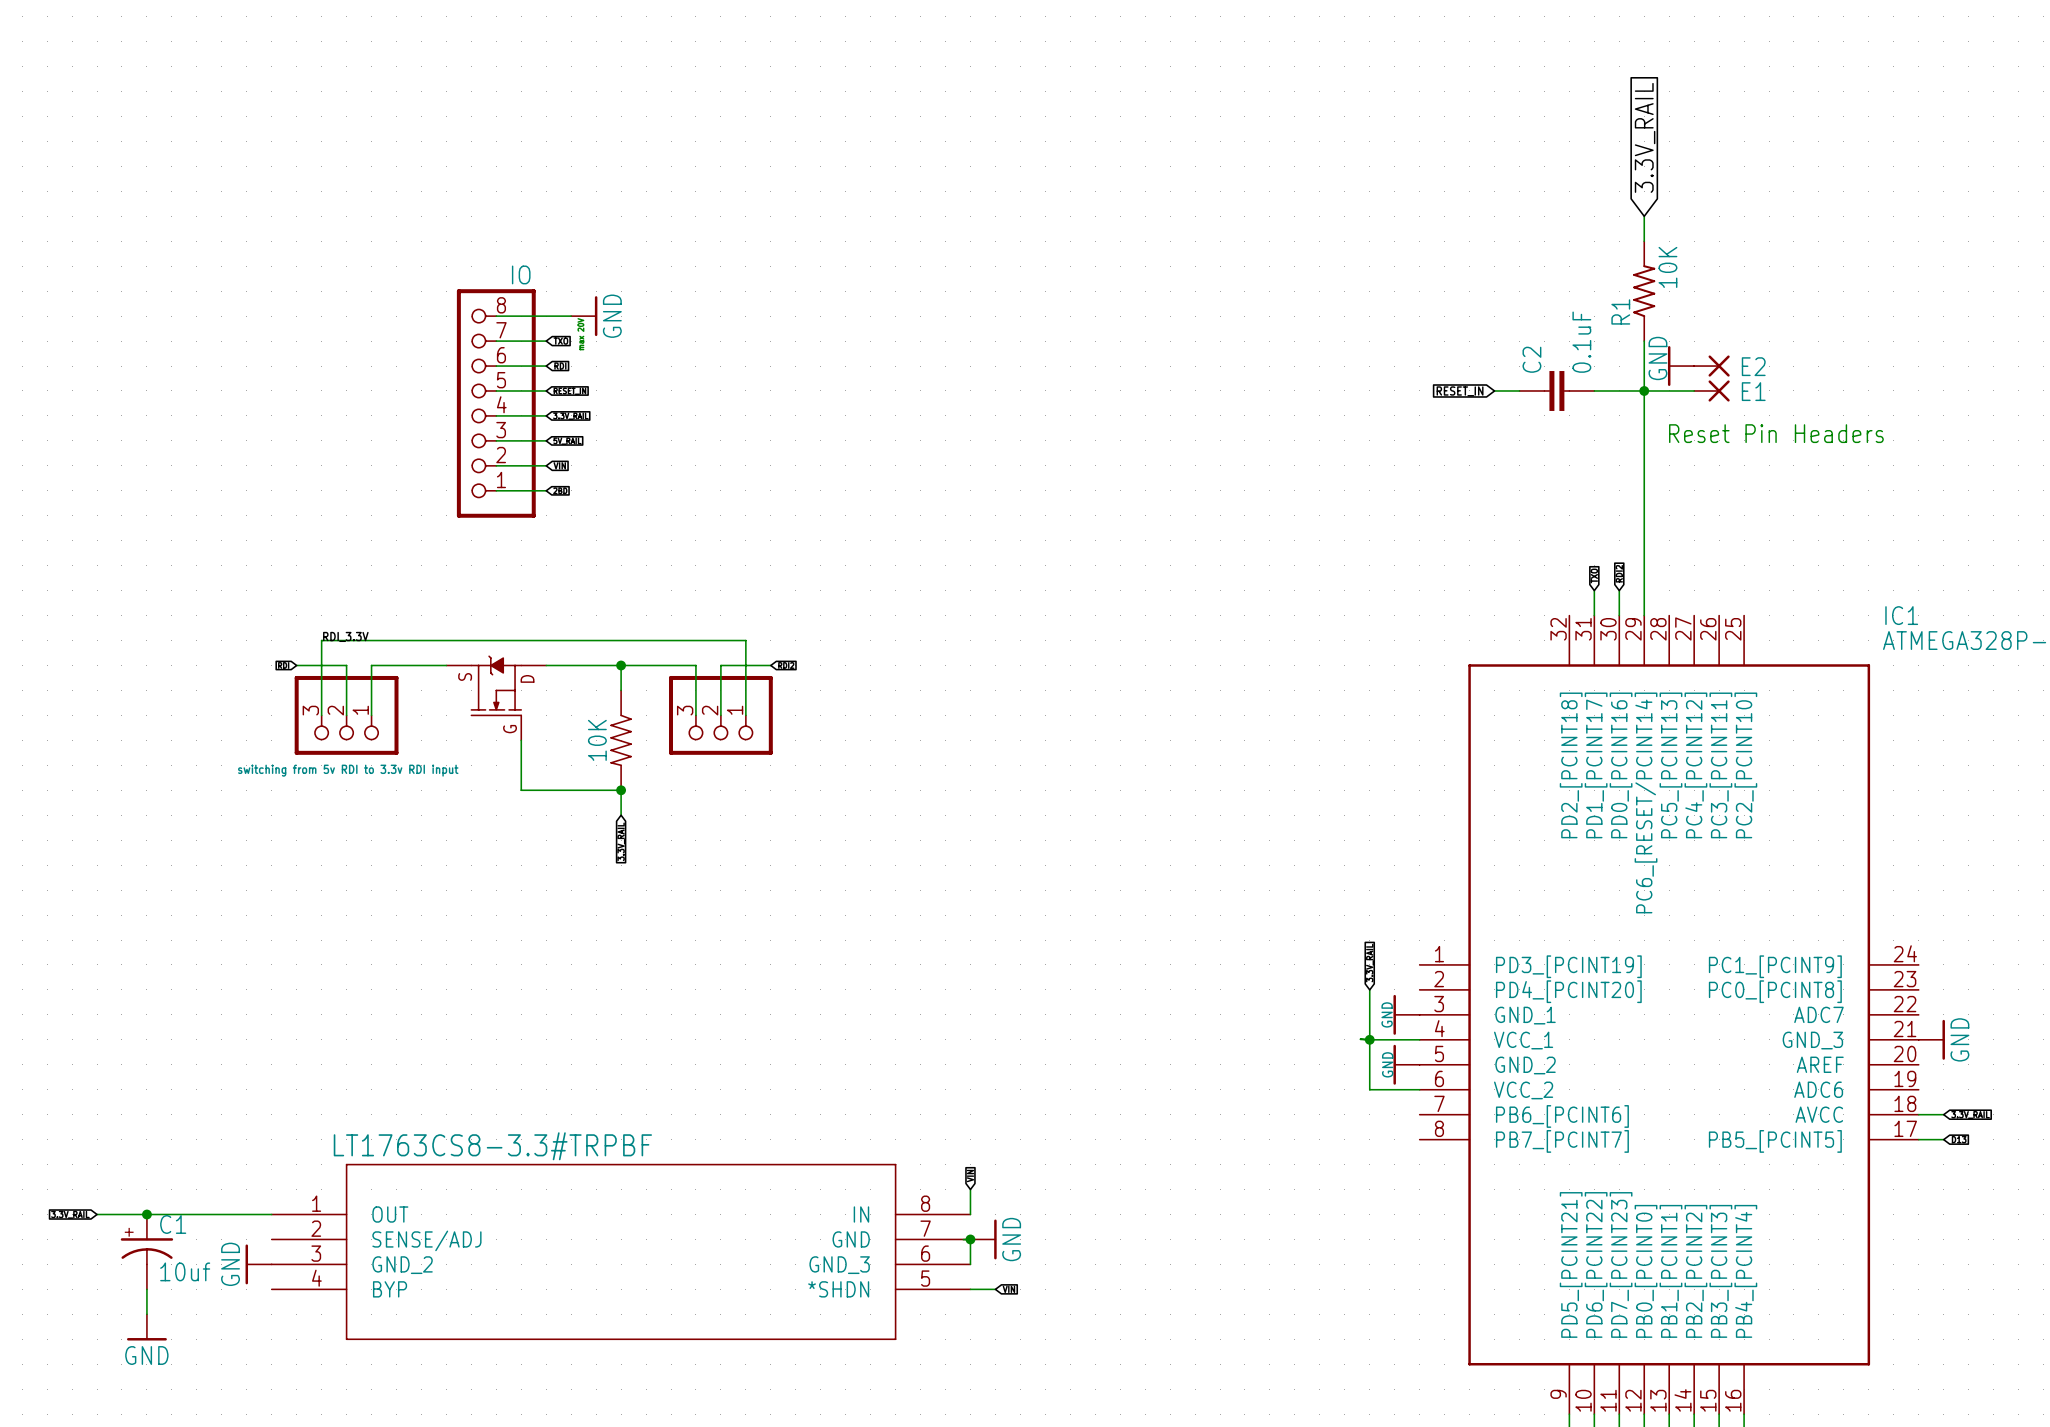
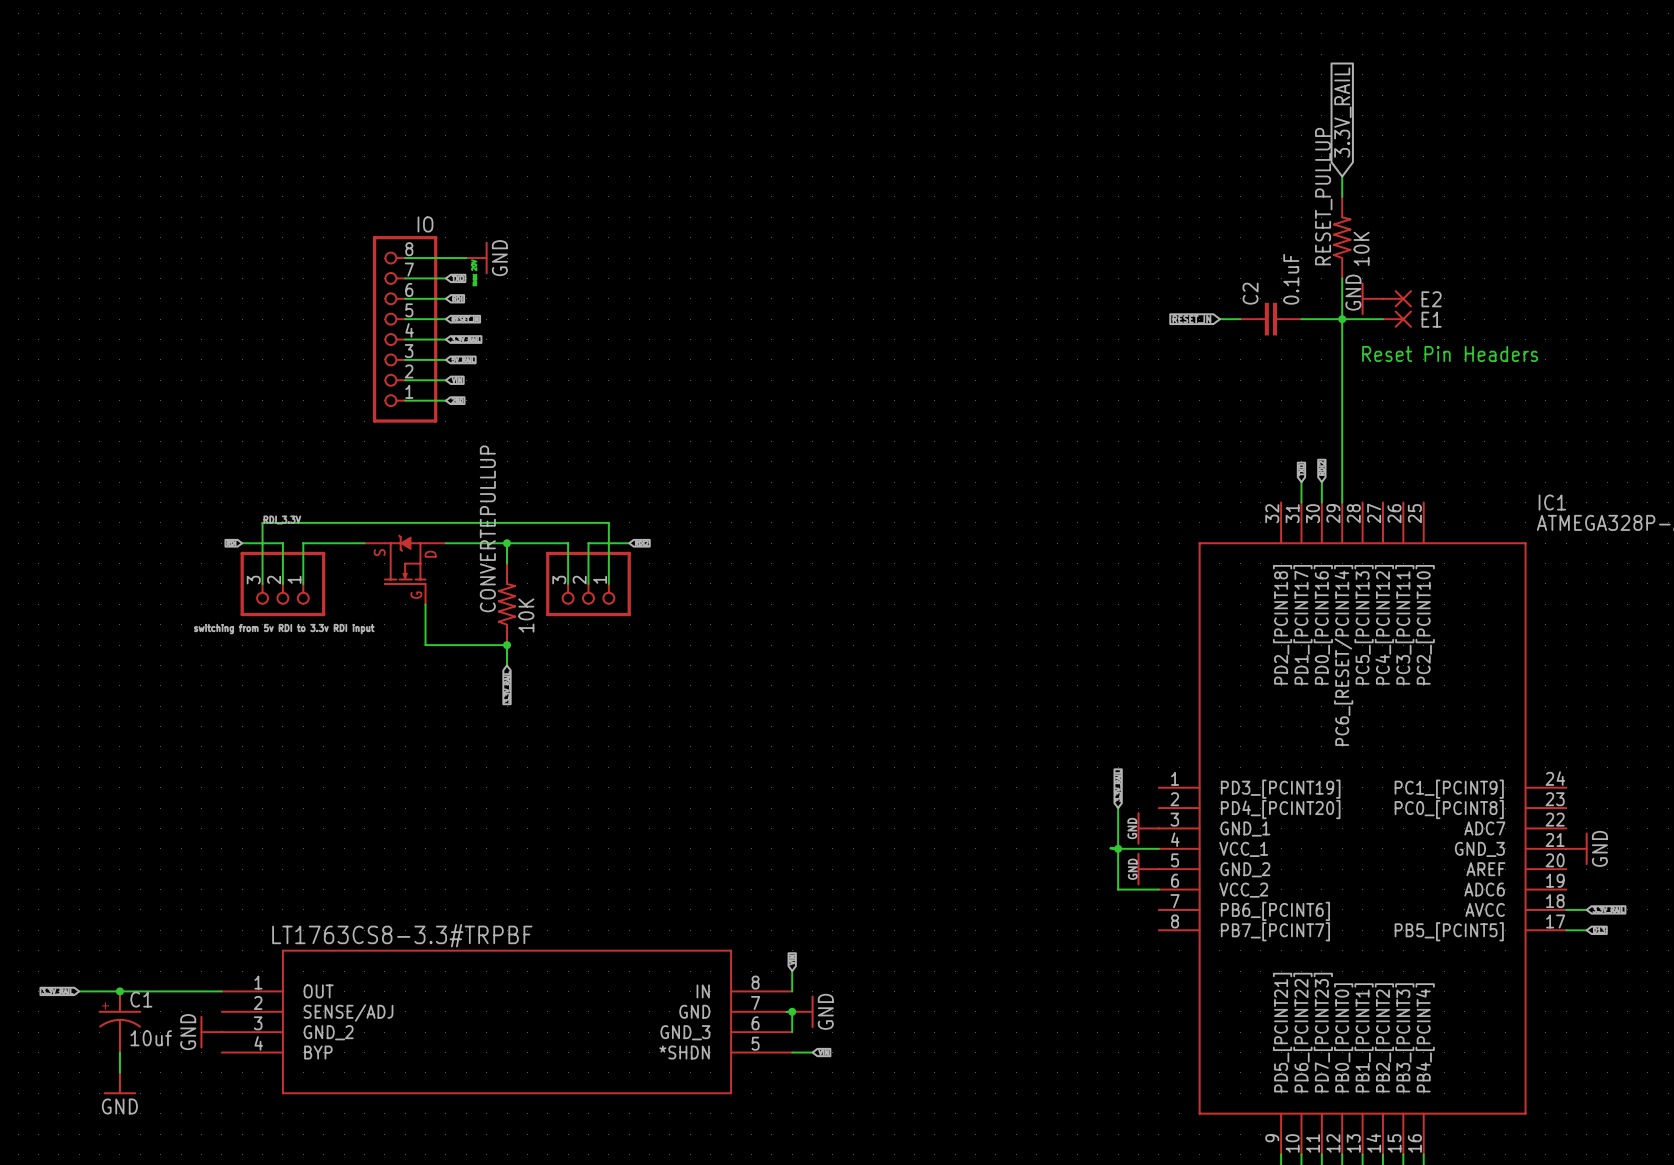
R1 value position: 10K (1667, 267) -> 10K (1361, 248)
R1 name: R1 (1620, 311) -> RESET_PULLUP (1323, 196)
part: 10K (621, 740) -> none
CONVERTEPULLUP: none -> 10K (507, 604)

